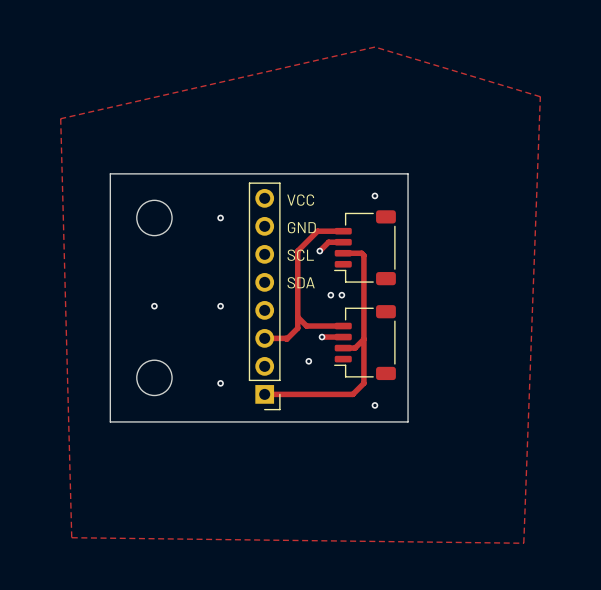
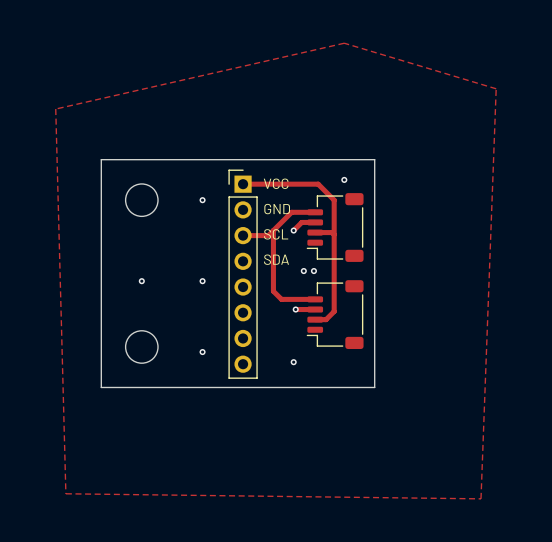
track: none -> (243, 184) (318, 184) (334, 200) (334, 234)
track: none -> (273, 230) (268, 235) (243, 235)
part rotation: 0° (264, 296) -> 180° (243, 274)
track: (297, 317) (297, 328) (286, 339) (264, 338) -> none
track: (363, 339) (363, 383) (352, 394) (264, 394) -> none
via: (308, 361) -> none
via: none -> (293, 362)
via: (374, 405) -> none

